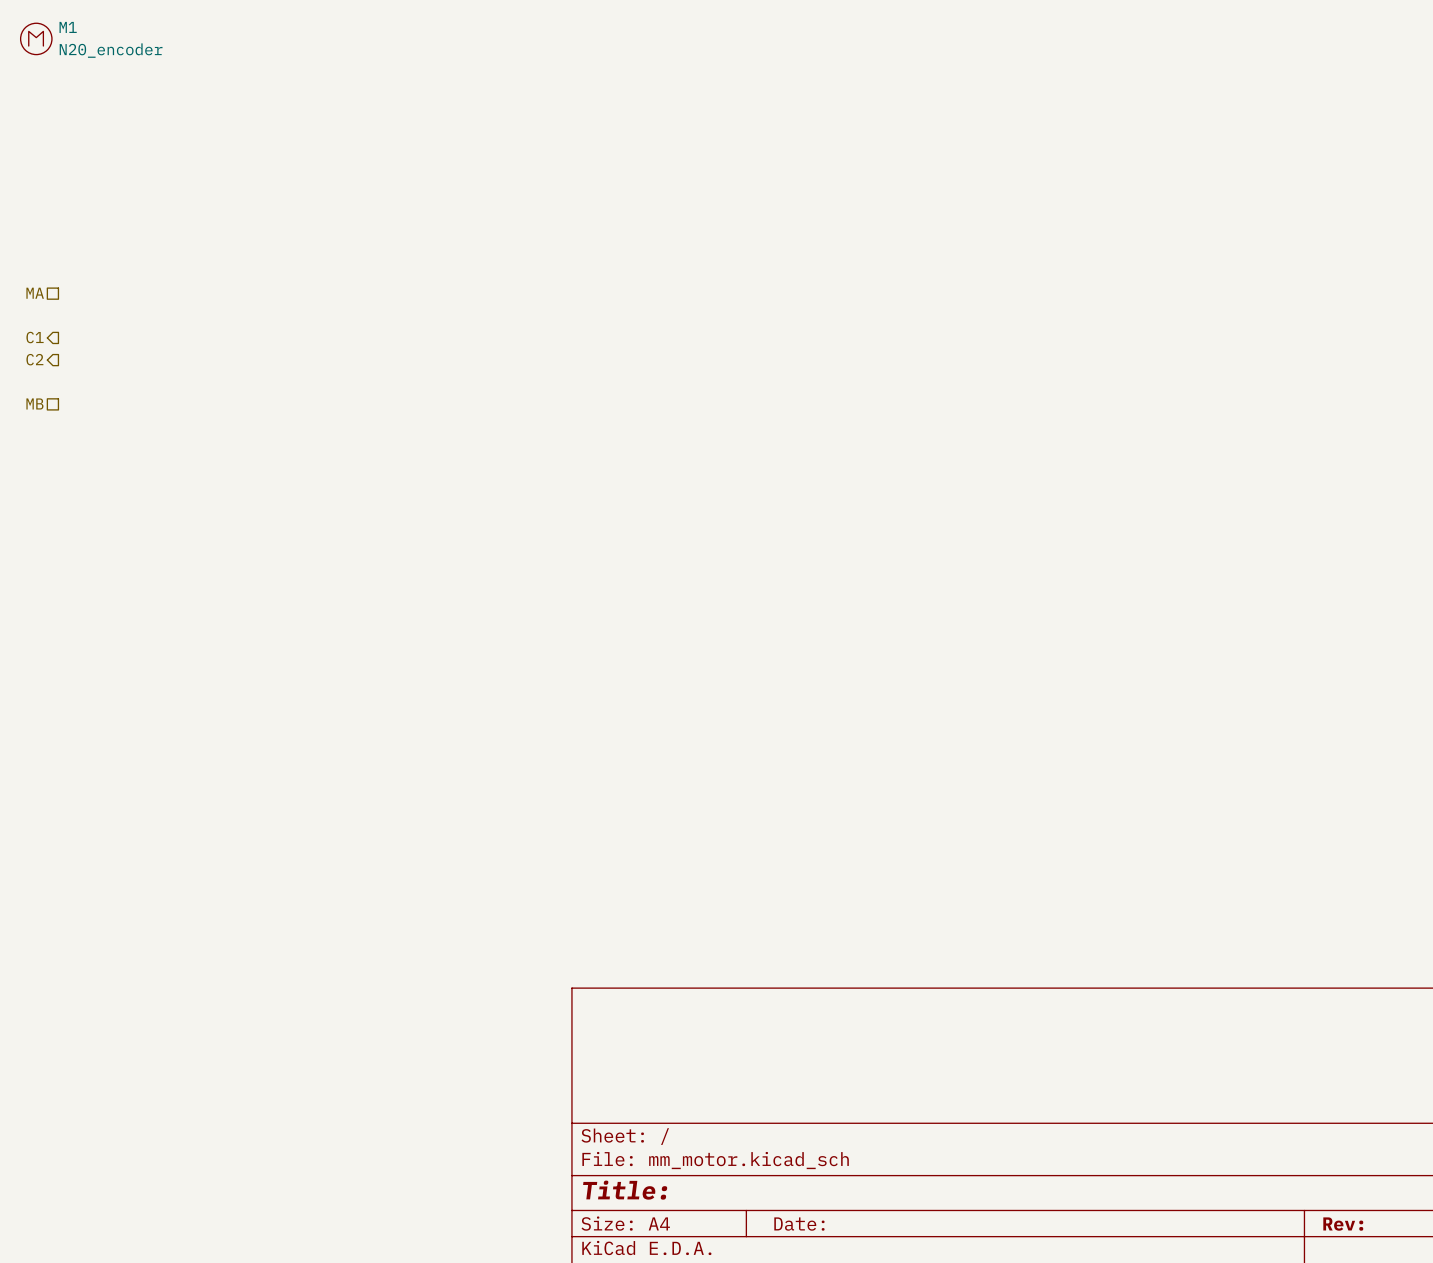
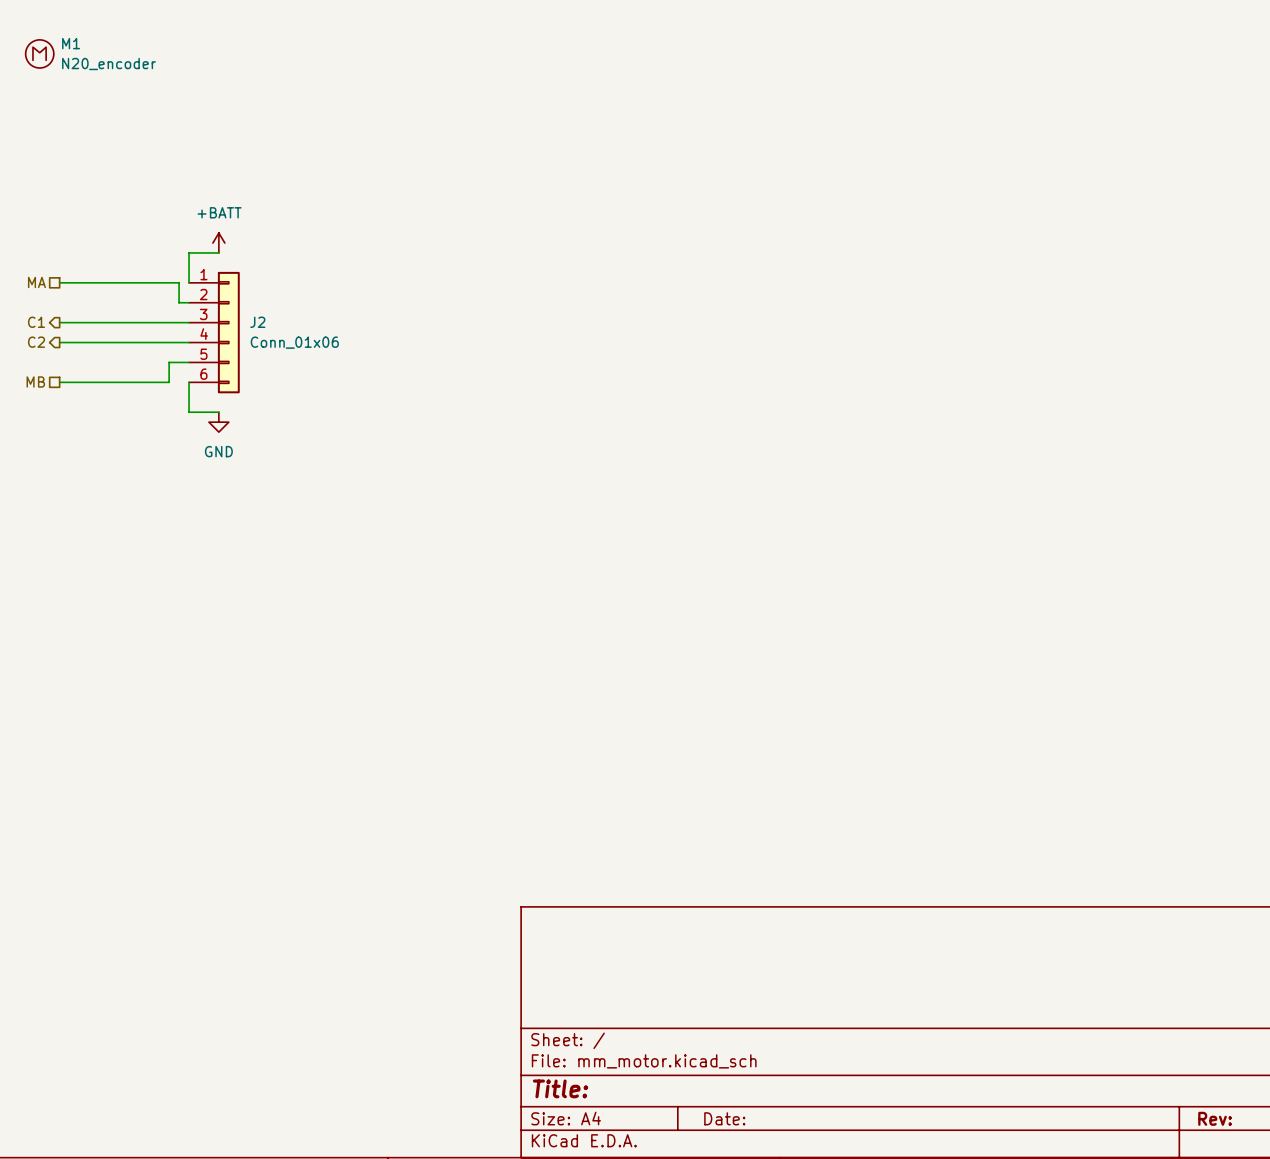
power symbol: none -> +BATT (218, 243)
wire: none -> (218, 252) (189, 252) (189, 282)
wire: none -> (59, 282) (179, 282) (179, 302) (189, 302)
wire: none -> (59, 322) (189, 322)
J2: none -> Conn_01x06 (214, 332)
wire: none -> (59, 342) (189, 342)
wire: none -> (189, 362) (169, 362) (169, 382) (59, 382)
wire: none -> (189, 382) (189, 412) (218, 412)
power symbol: none -> GND (218, 422)

